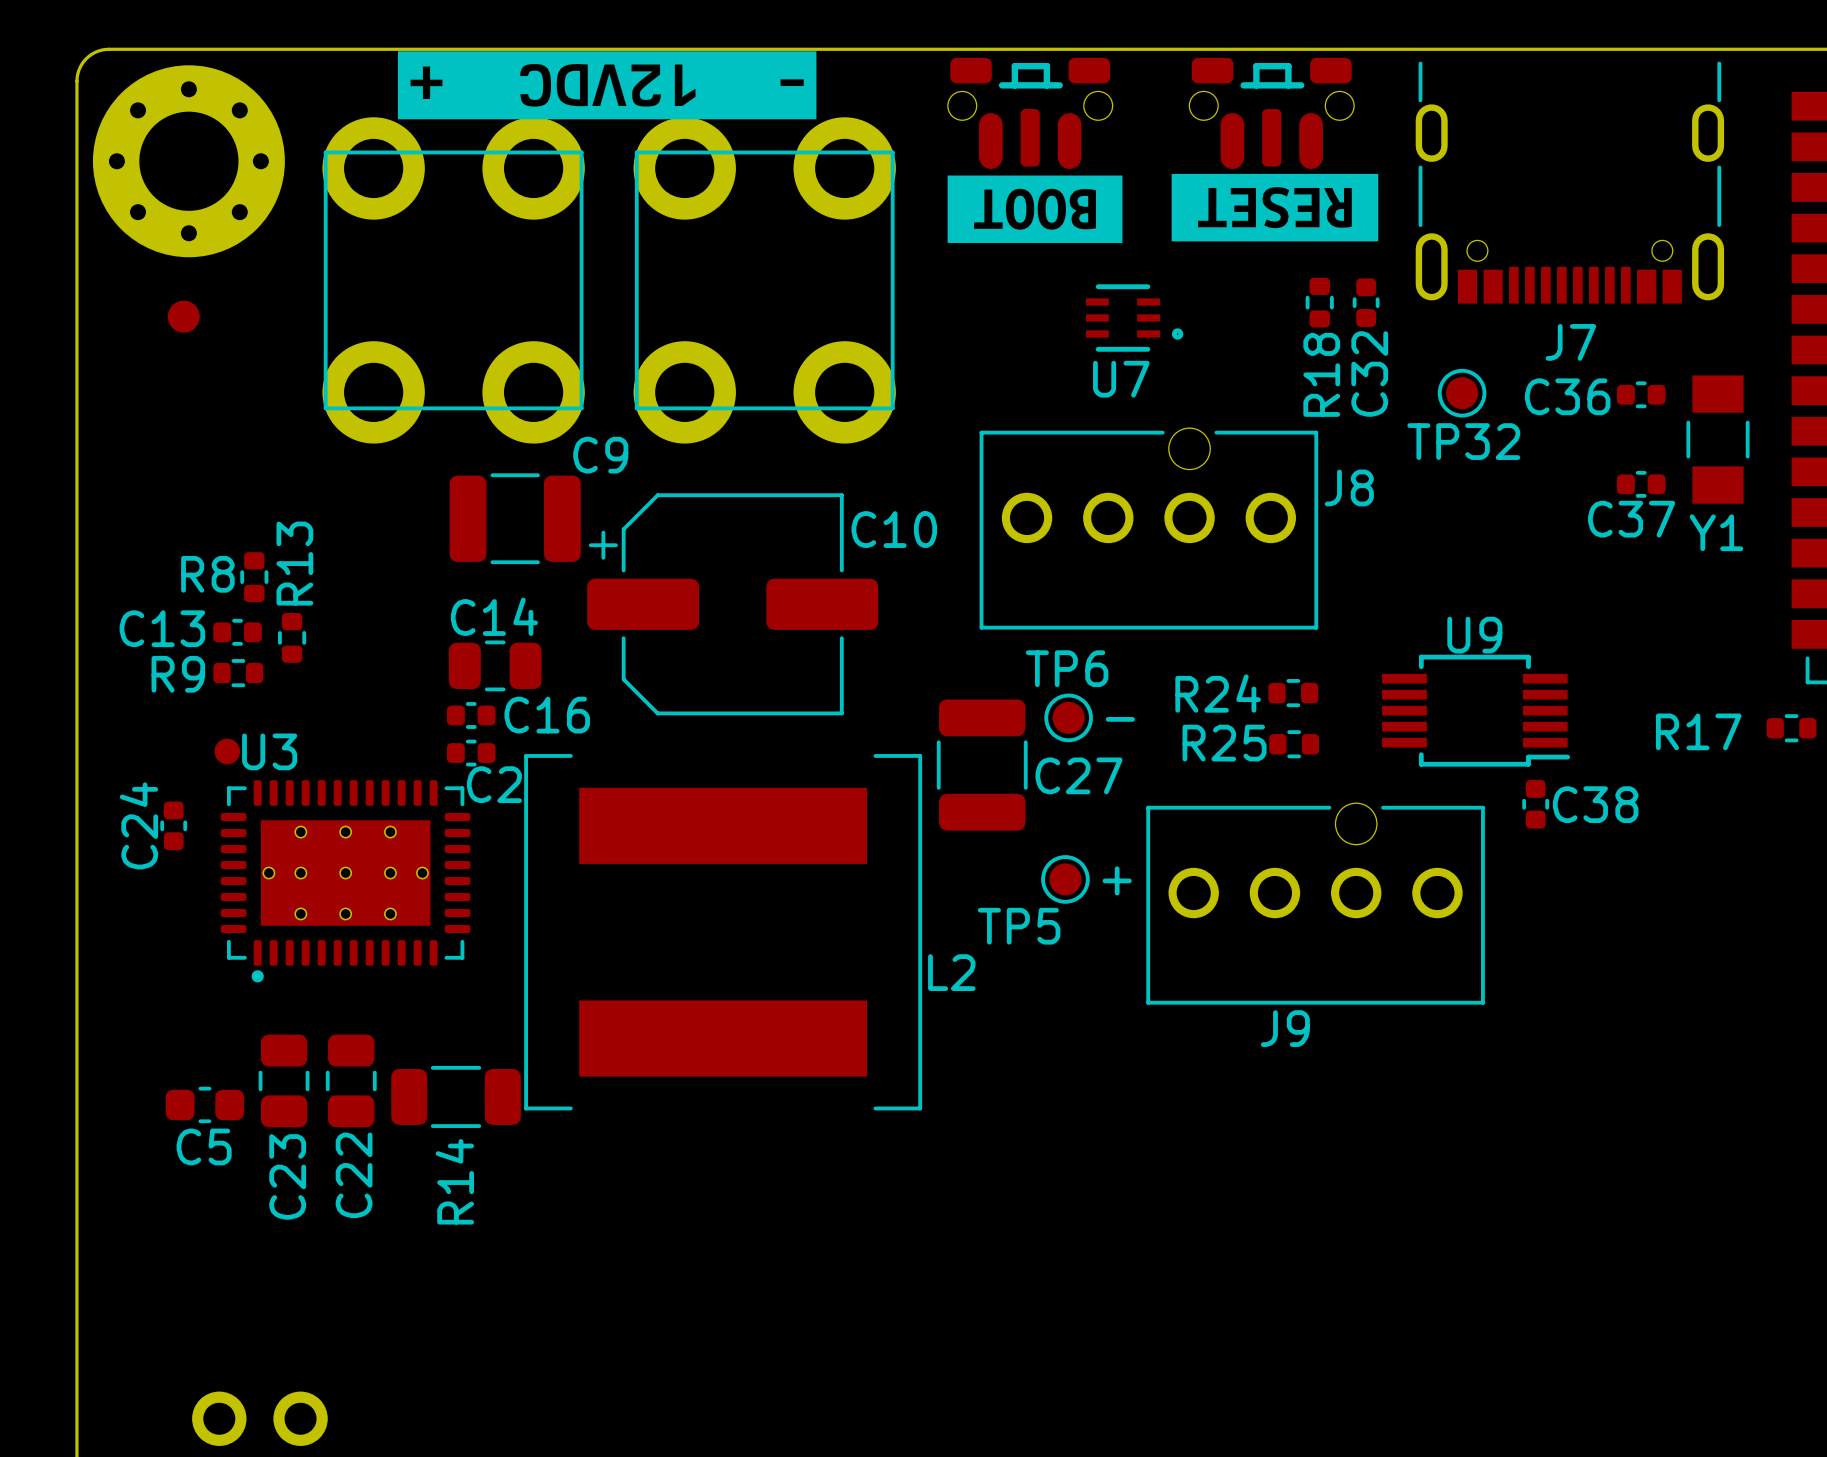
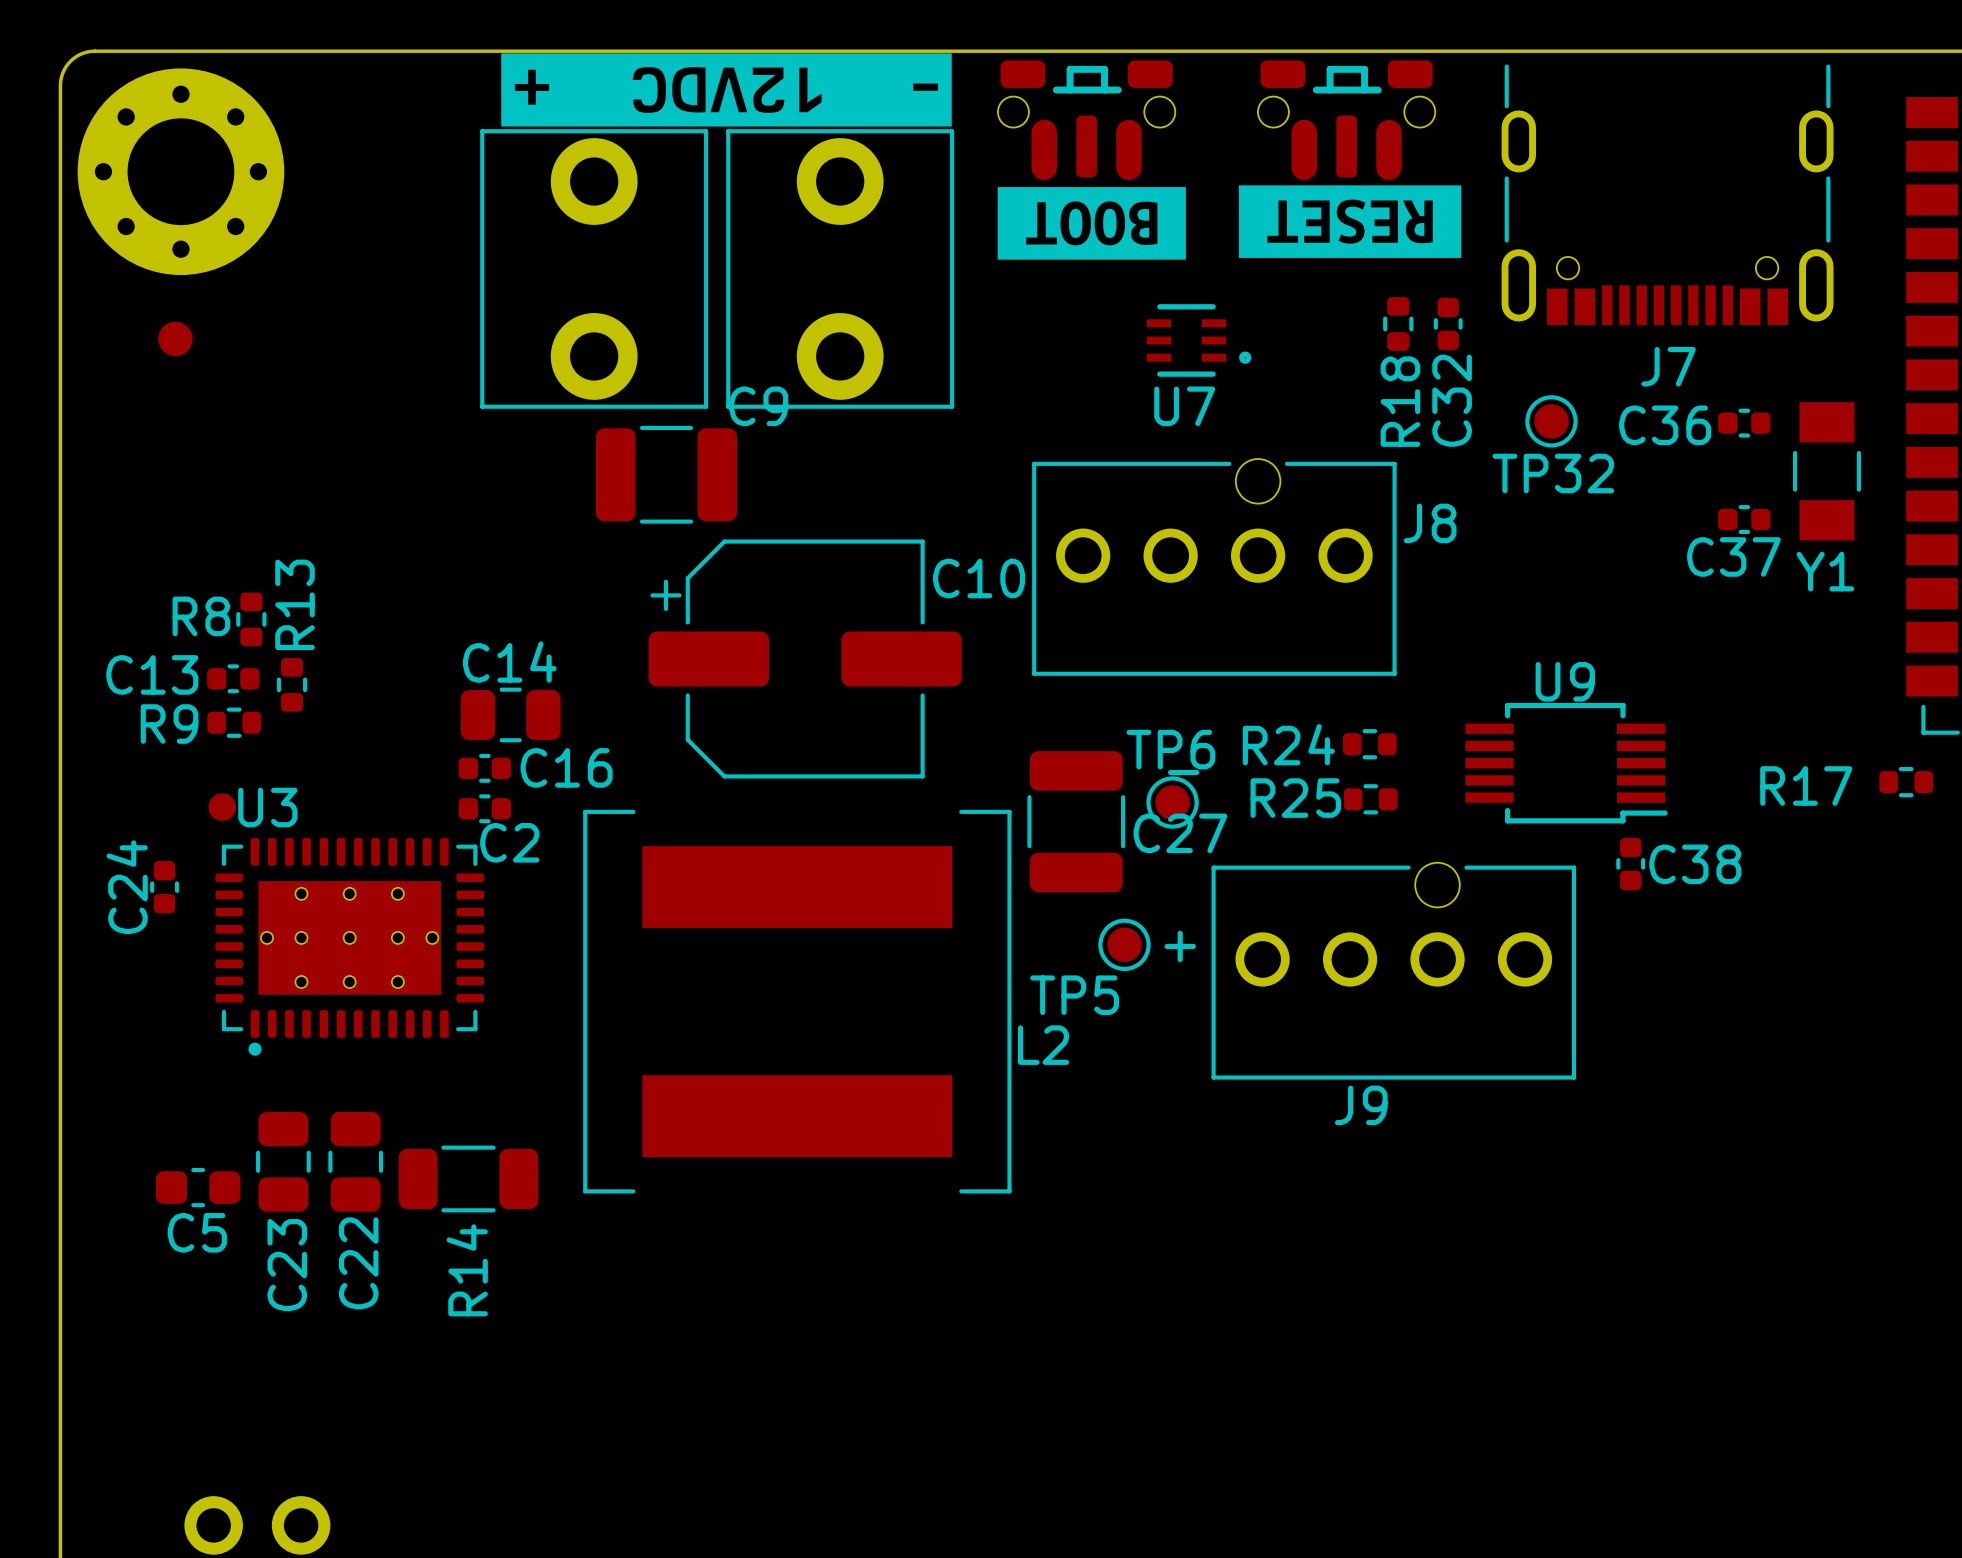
drawing position: (607, 85) -> (726, 89)
part: none -> (594, 268)
part: none -> (840, 268)
part: (453, 280) -> none
part: (764, 280) -> none
C10 footprint: [587, 493, 879, 716] -> [648, 539, 962, 779]
C9 position: (515, 518) -> (666, 474)
TP6 position: (1068, 717) -> (1172, 802)
C27 position: (982, 765) -> (1076, 821)
L2 position: (723, 932) -> (797, 1001)

